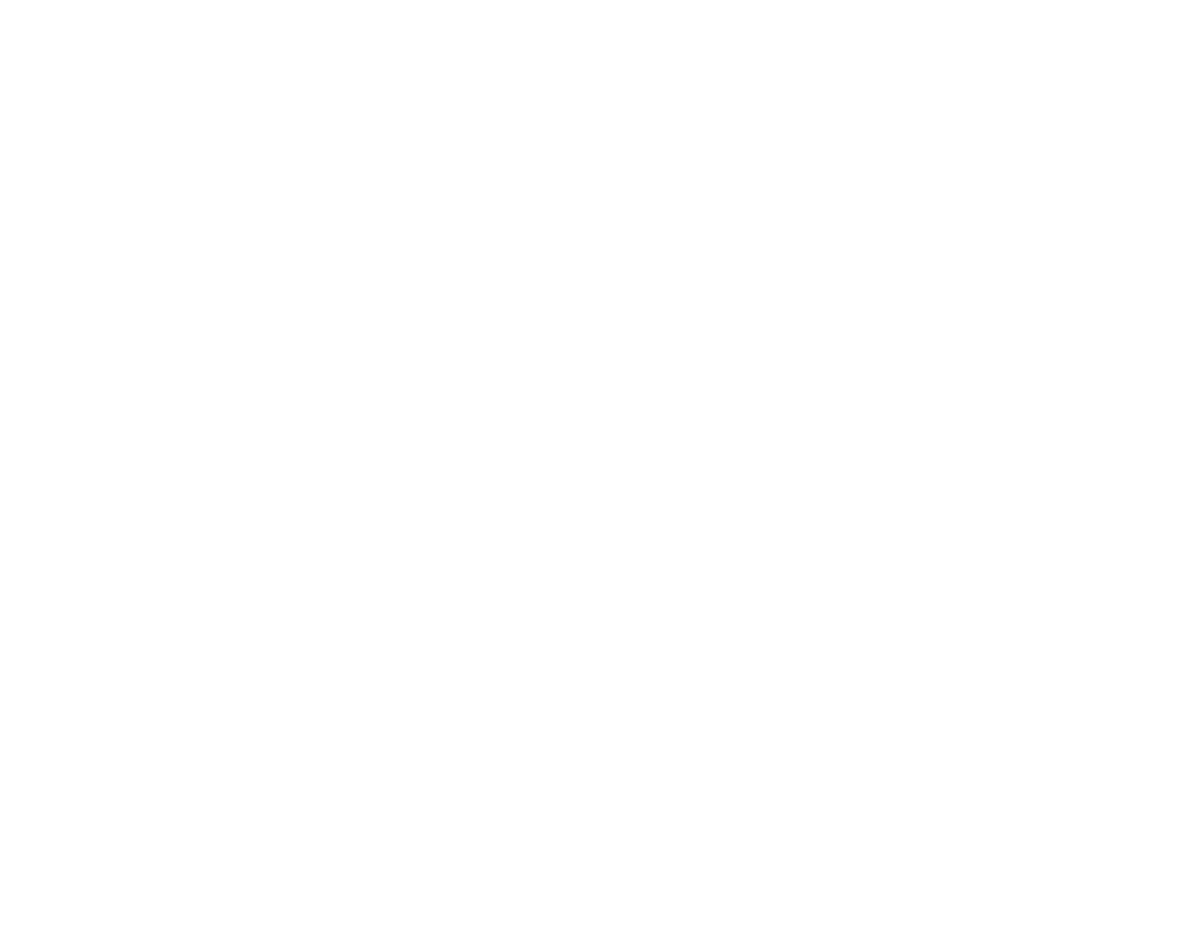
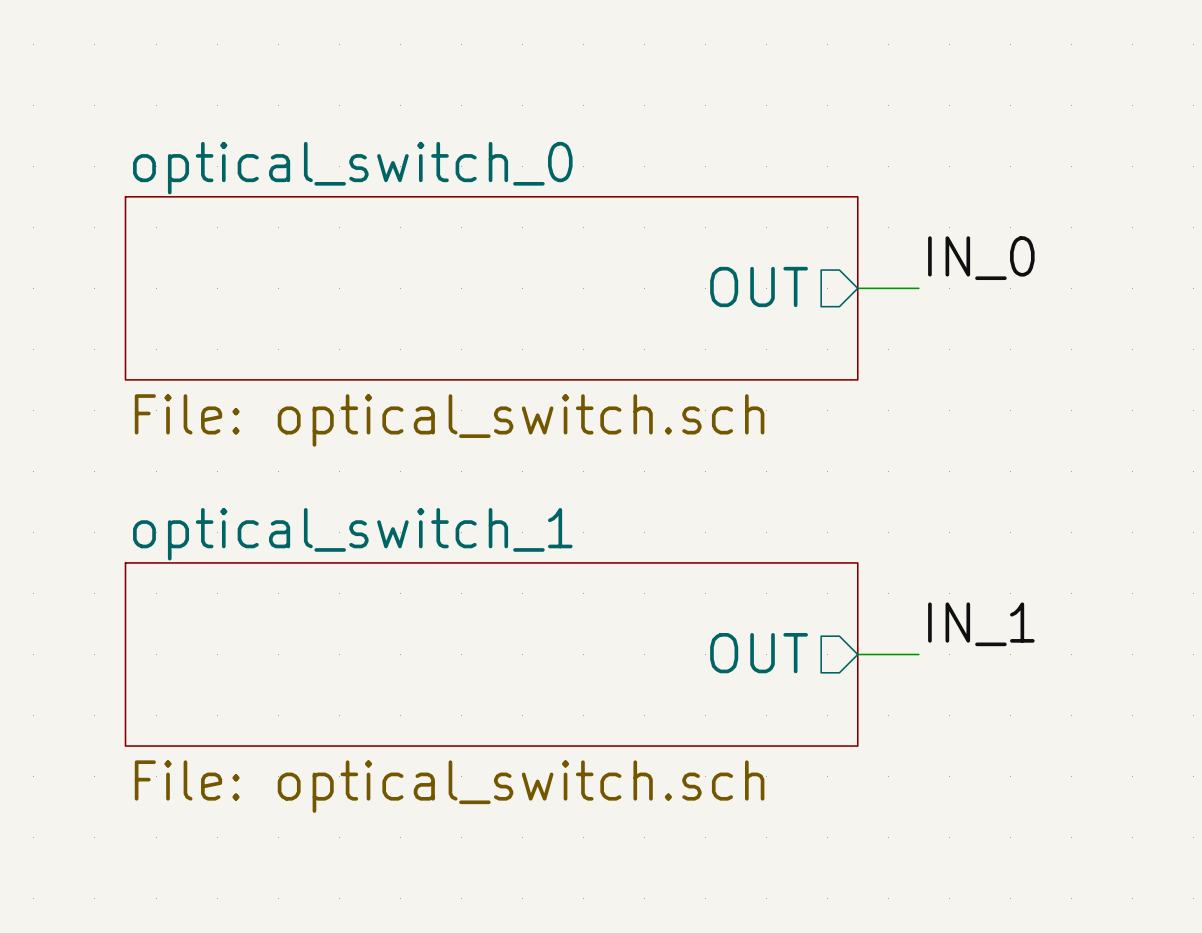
label: none -> IN_0 (981, 258)
sheet pin: none -> OUT (759, 286)
sheet optical_switch_0: none -> File: optical_switch.sch (491, 288)
wire: none -> (857, 288) (918, 288)
label: none -> IN_1 (981, 624)
sheet pin: none -> OUT (759, 653)
sheet optical_switch_1: none -> File: optical_switch.sch (491, 654)
wire: none -> (857, 654) (918, 654)

